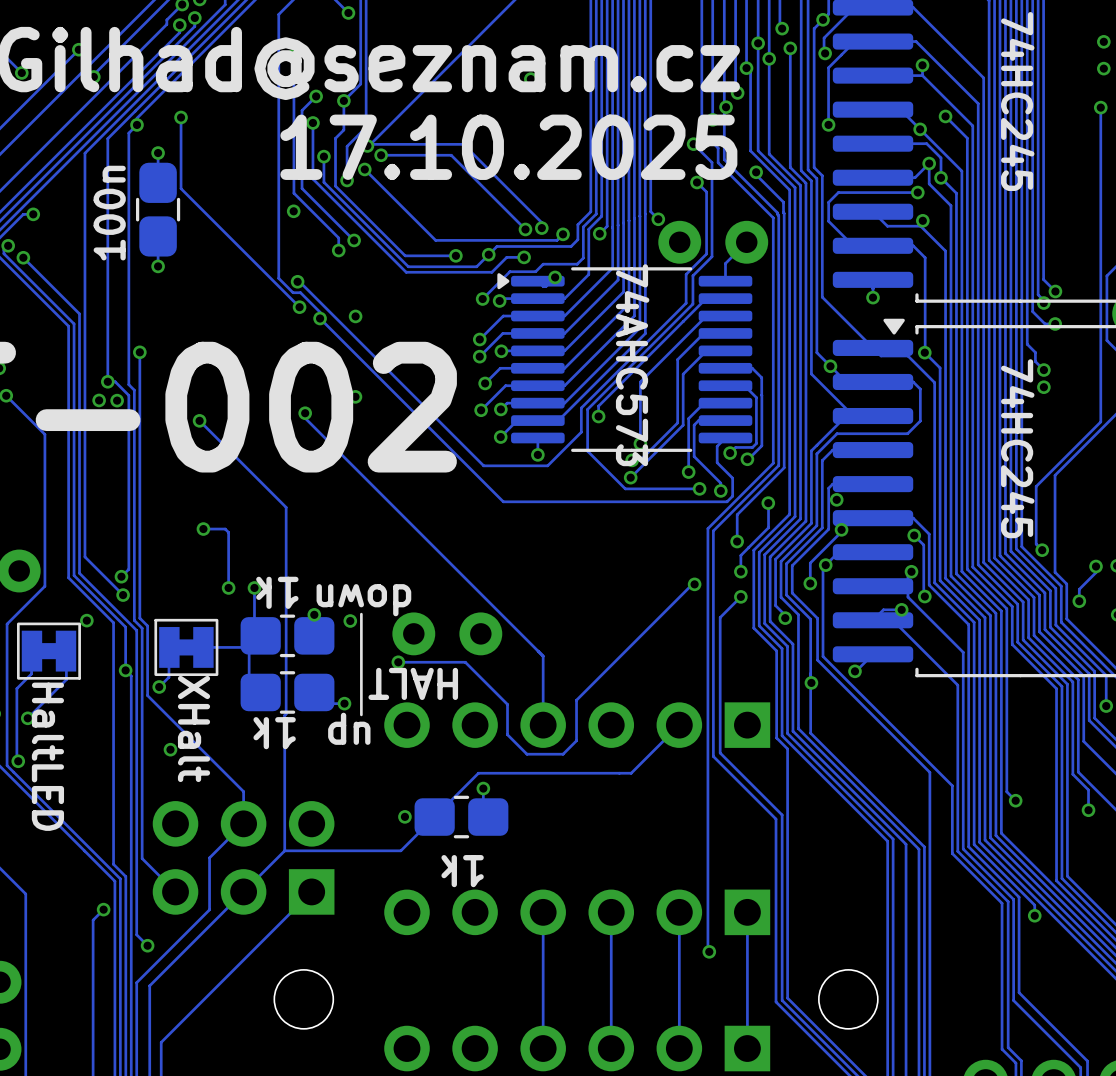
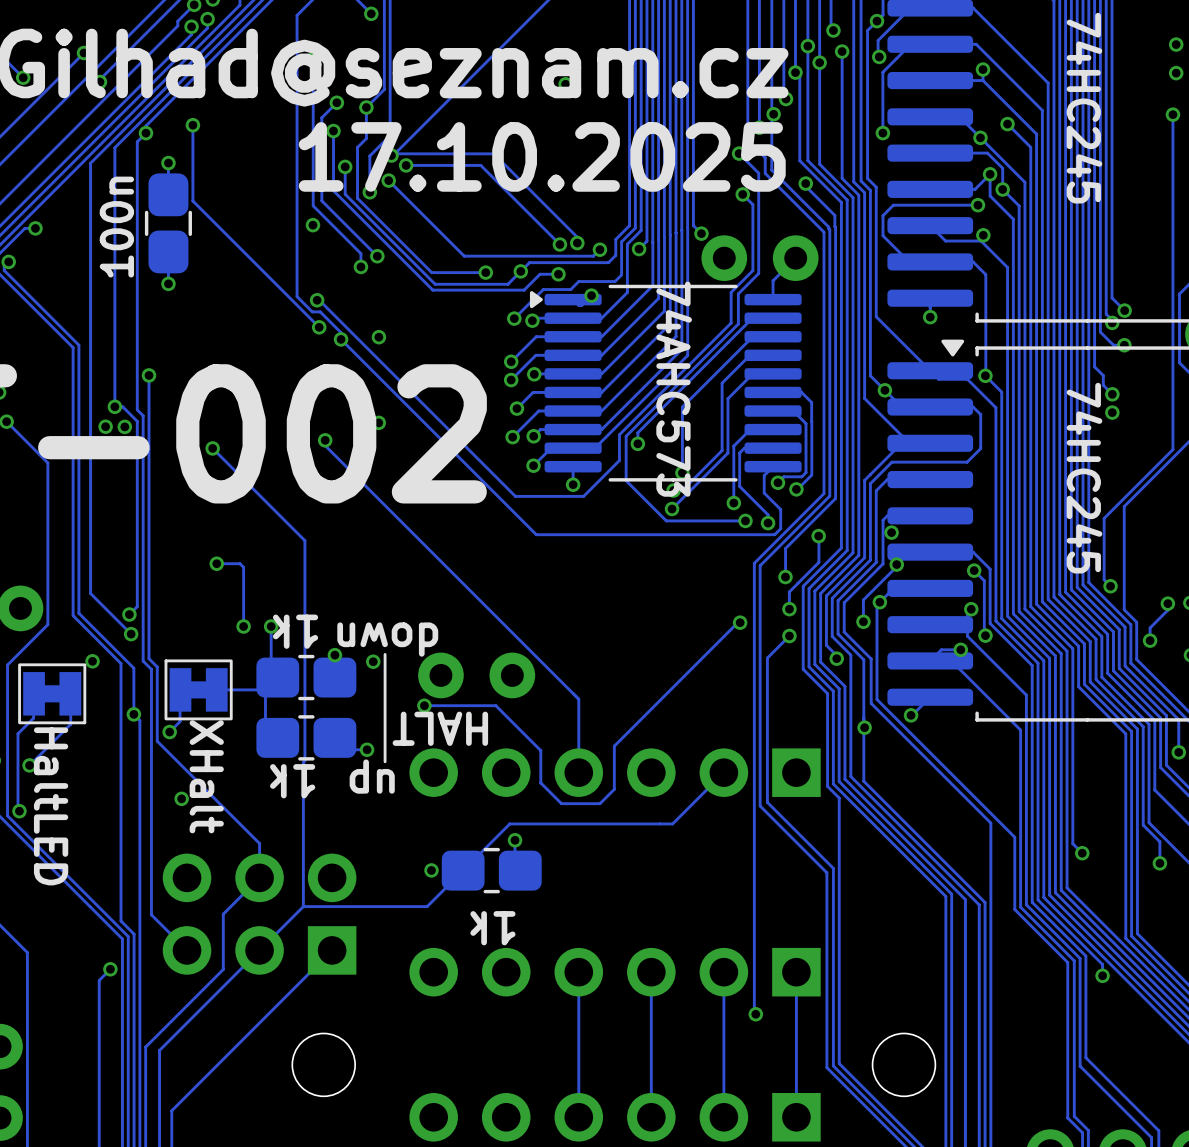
track: (23, 257) (79, 313) (79, 573) (136, 630) (136, 934) (147, 945) -> none
via: (23, 257) -> none
via: (147, 945) -> none

